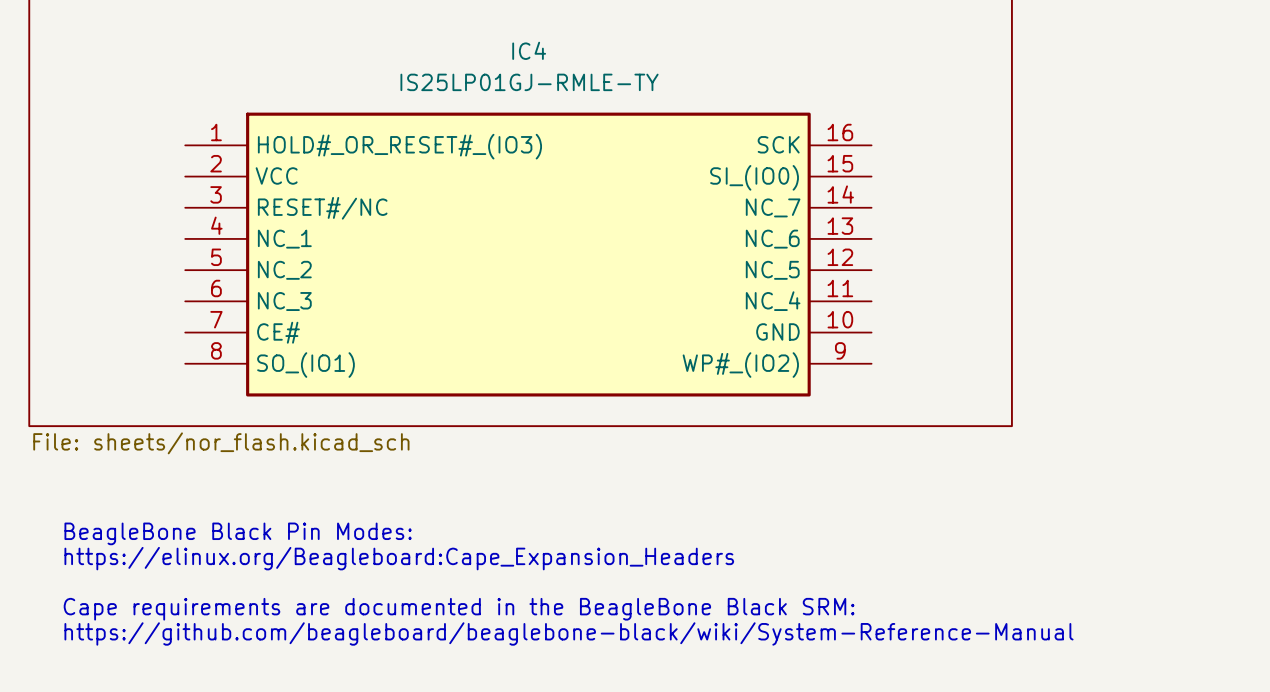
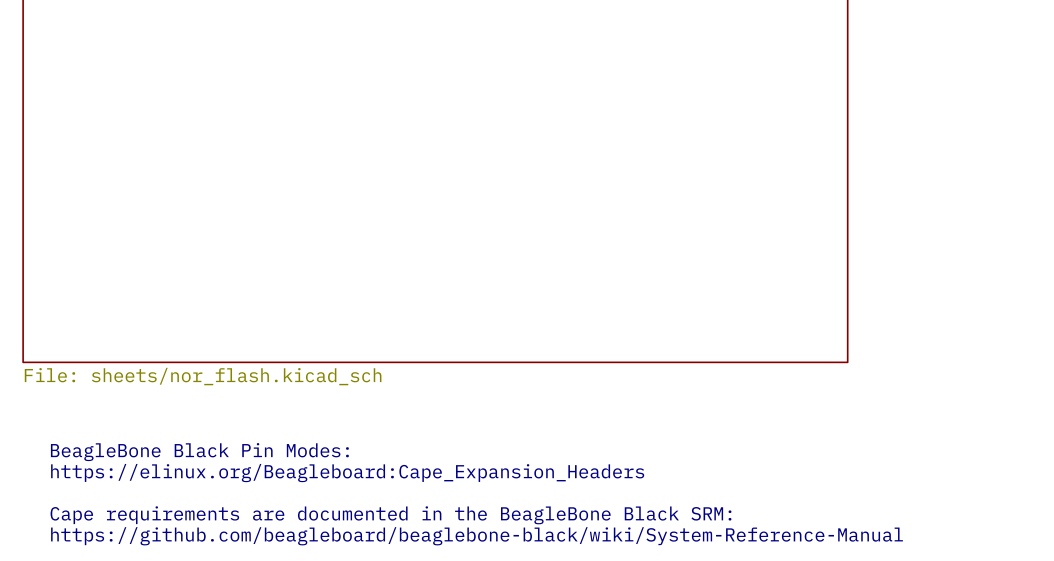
IC4: IS25LP01GJ-RMLE-TY (528, 254) -> none

